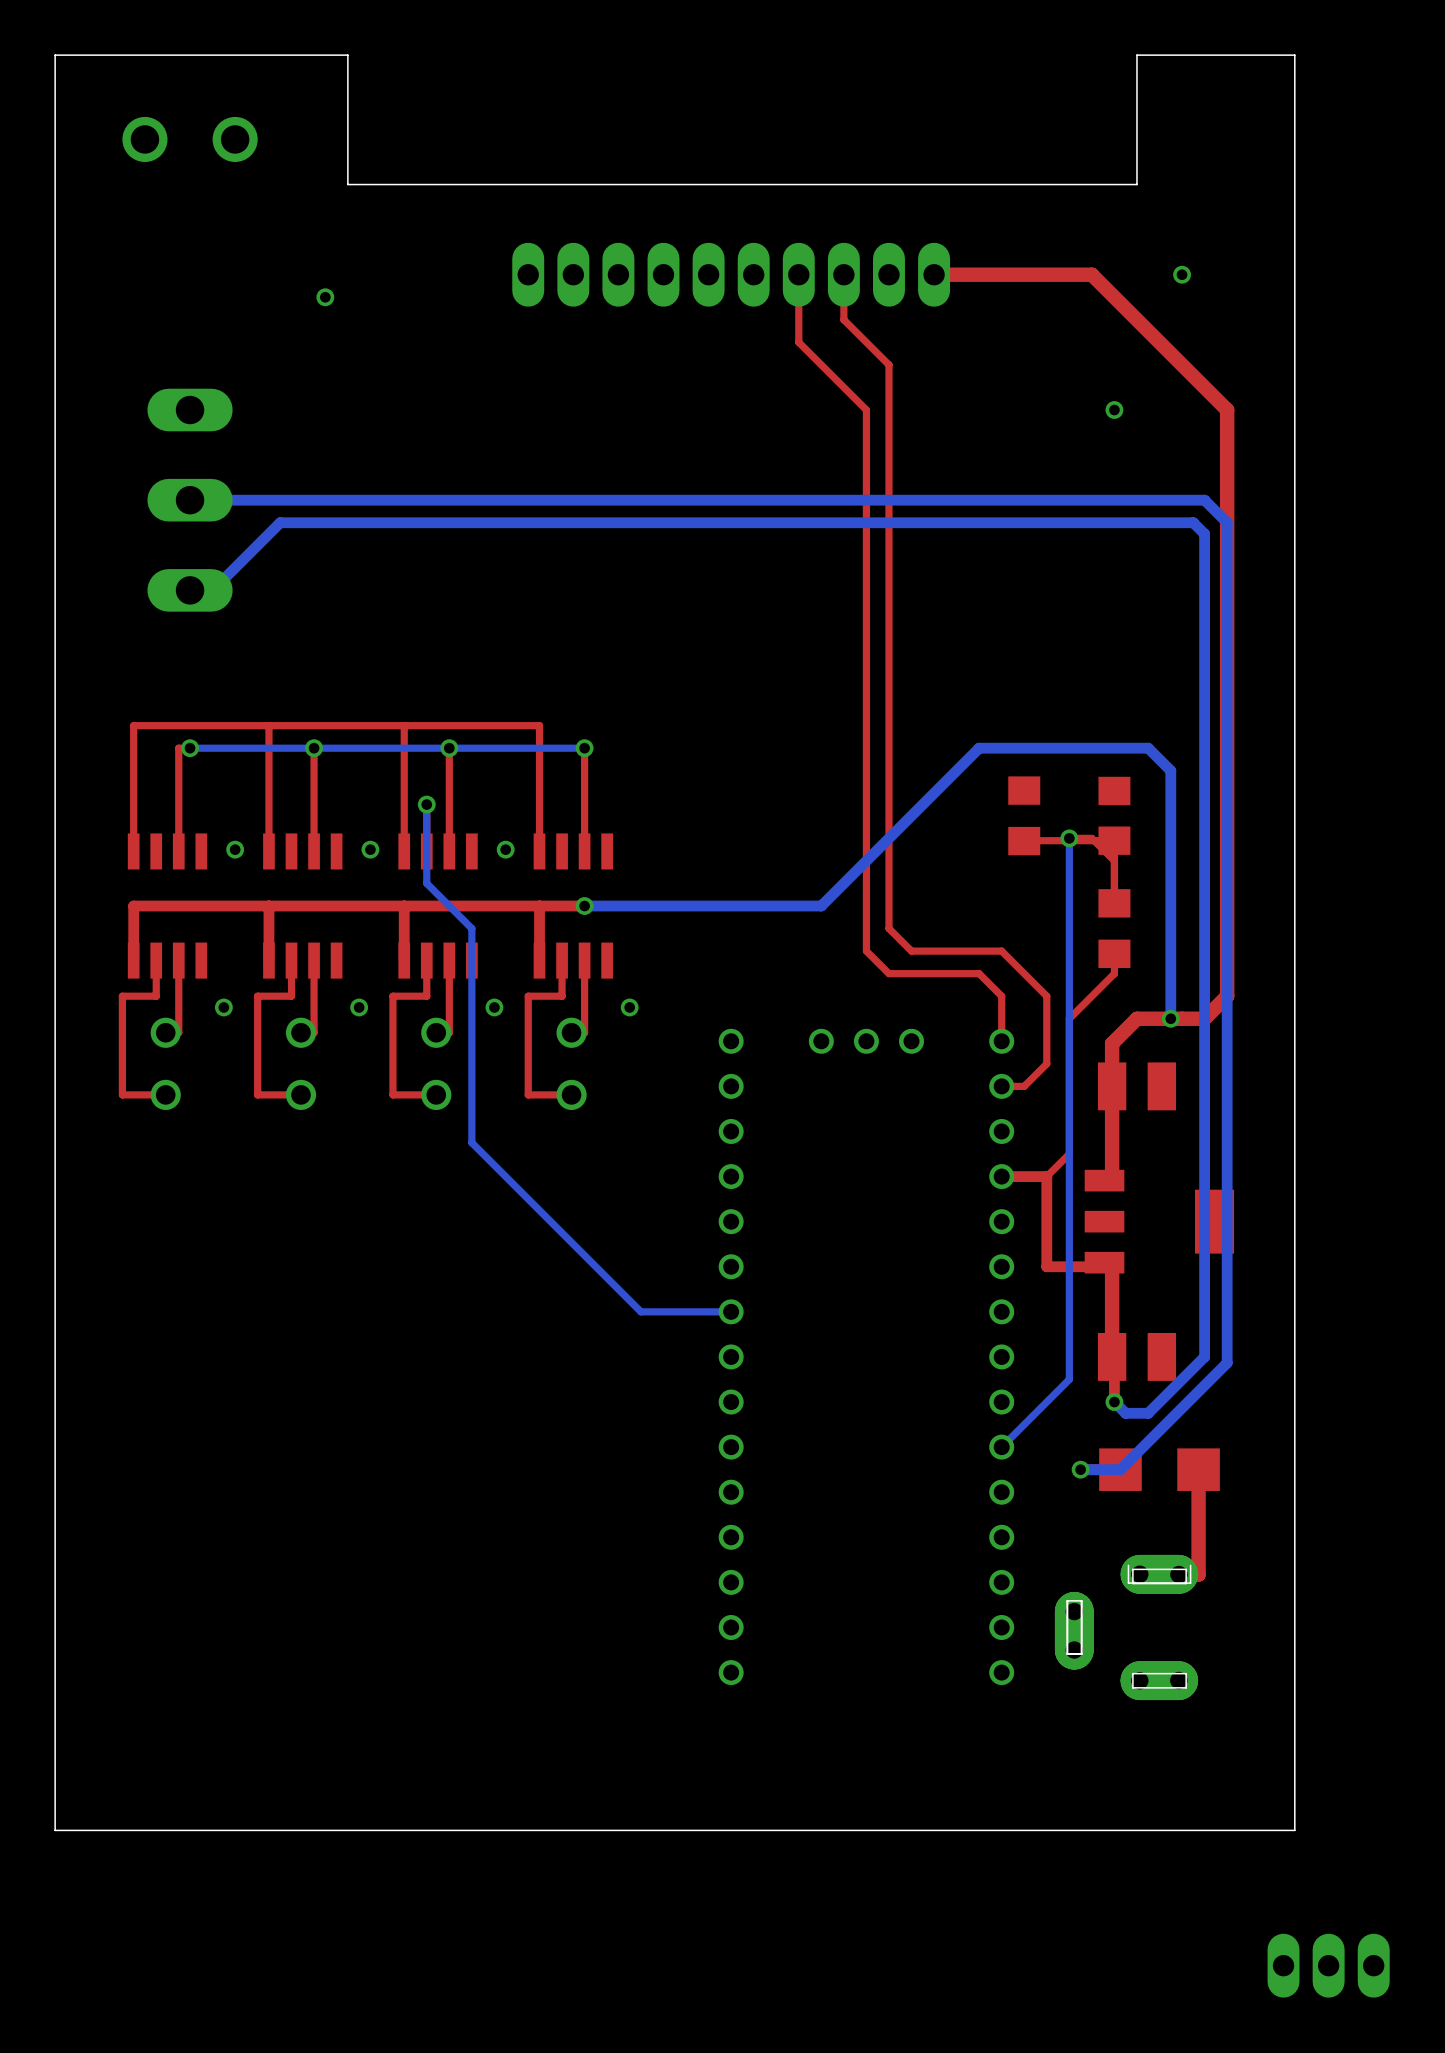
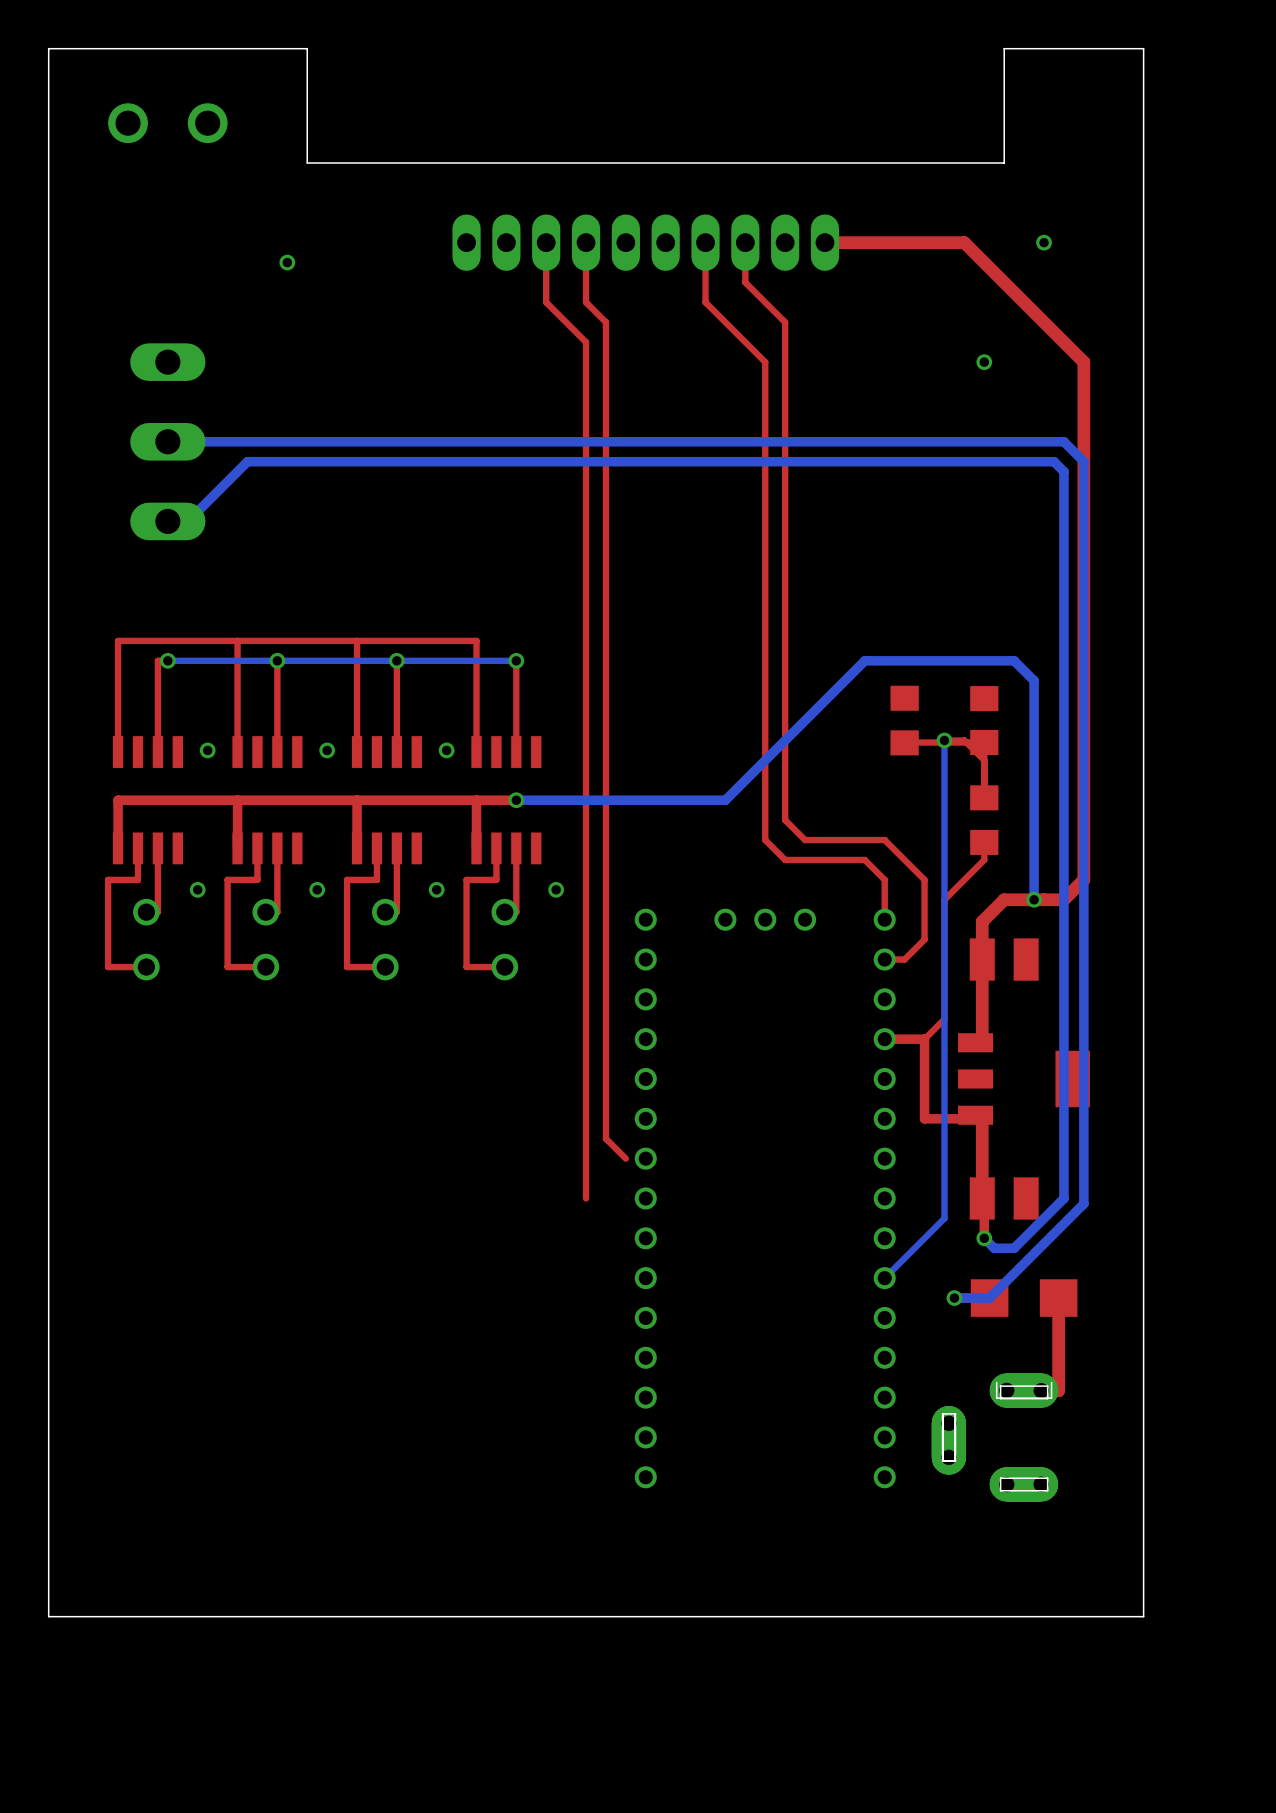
top track: none -> (546, 242) (546, 302) (586, 342) (586, 1198)
top track: none -> (586, 242) (586, 302) (605, 322) (605, 1138) (625, 1158)
bottom track: (426, 804) (426, 883) (471, 928) (471, 1142) (640, 1311) (731, 1311) -> none
via: (426, 804) -> none
part: (1328, 1965) -> none

